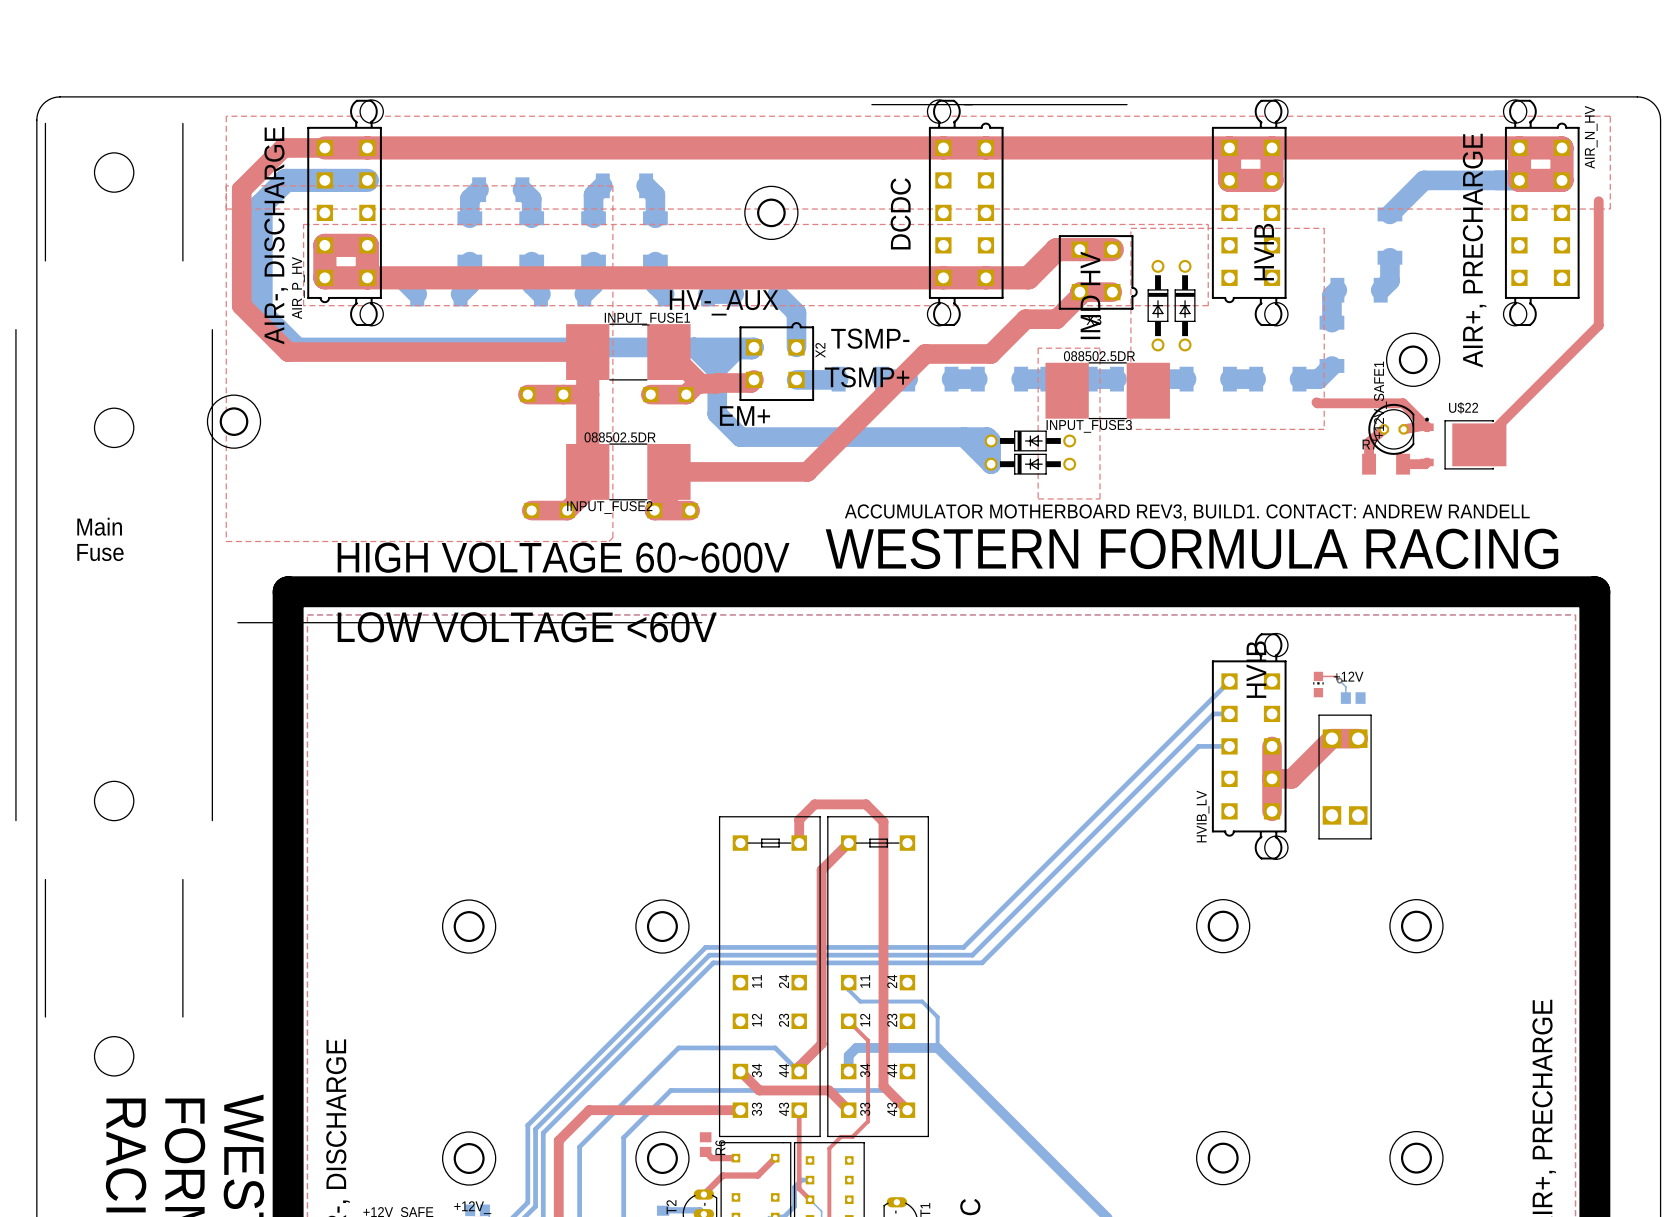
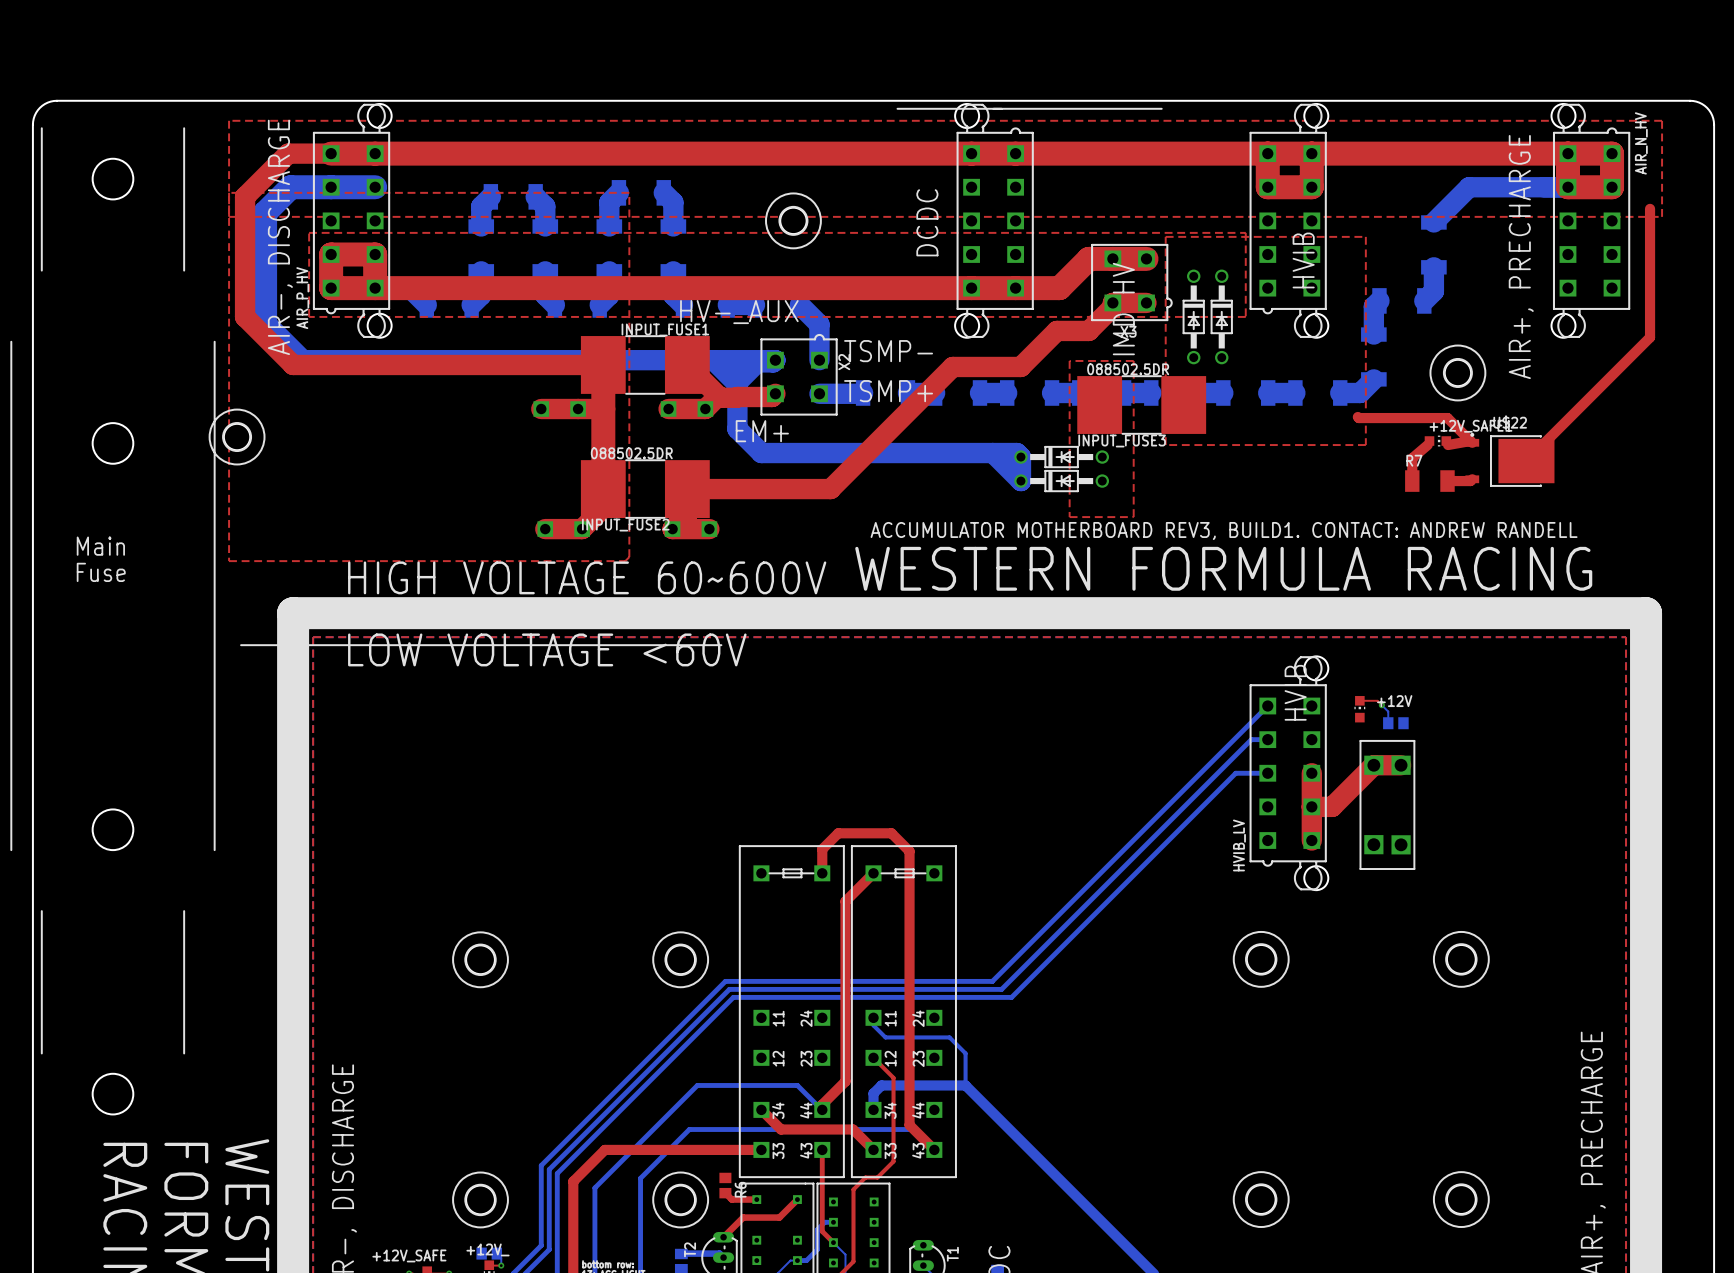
+12V_SAFE1 name position: +12V_SAFE1 (1380, 400) -> +12V_SAFE1 (1470, 426)
+12V_SAFE1 footprint: [1368, 403, 1415, 455] -> [1424, 435, 1452, 447]

